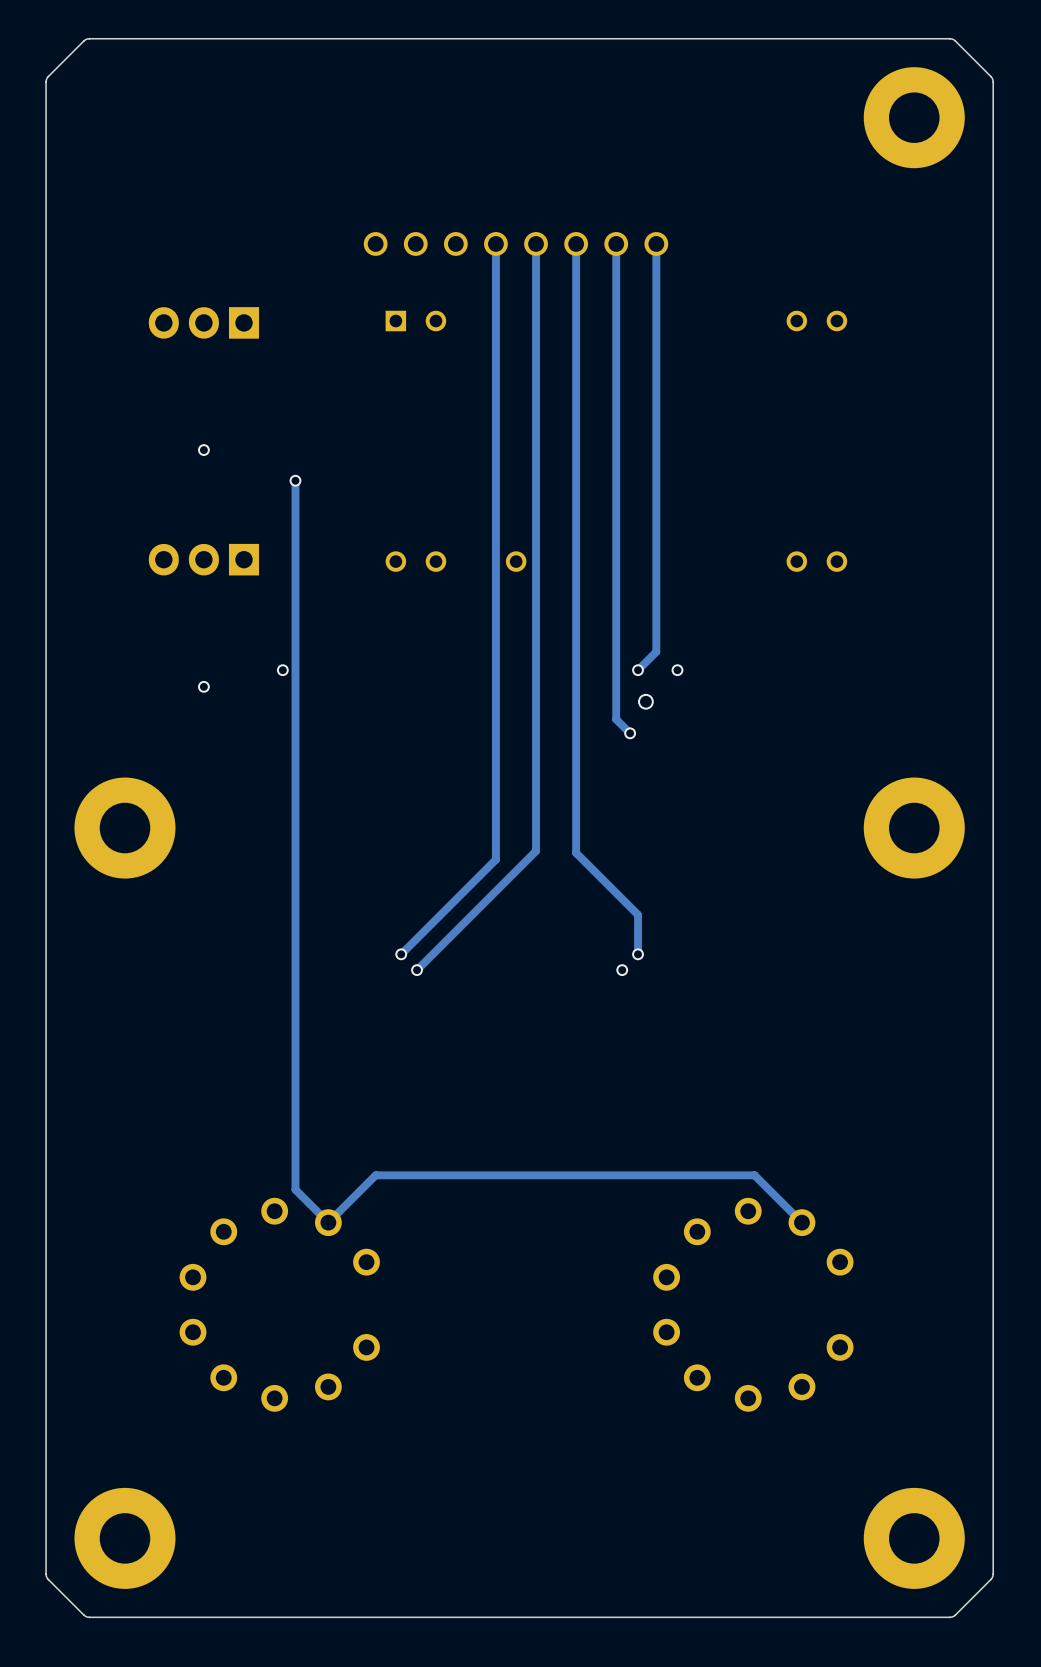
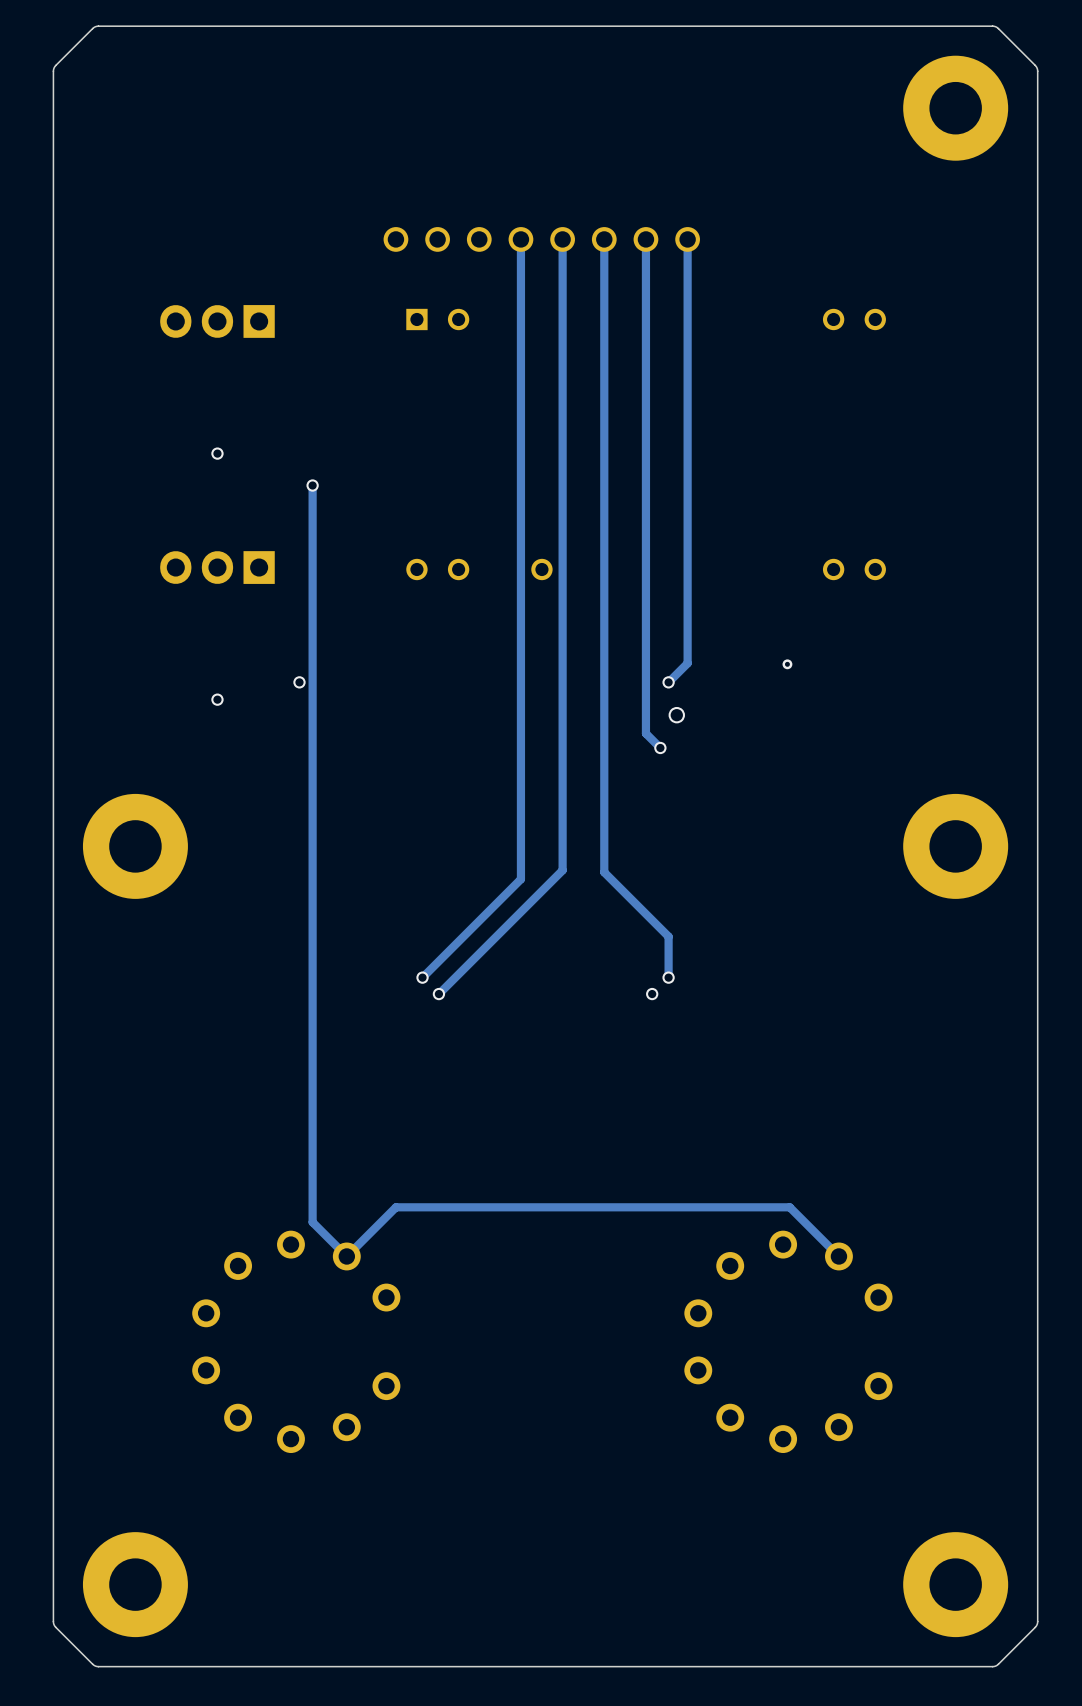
via: none -> (787, 664)
via: (677, 670) -> none

